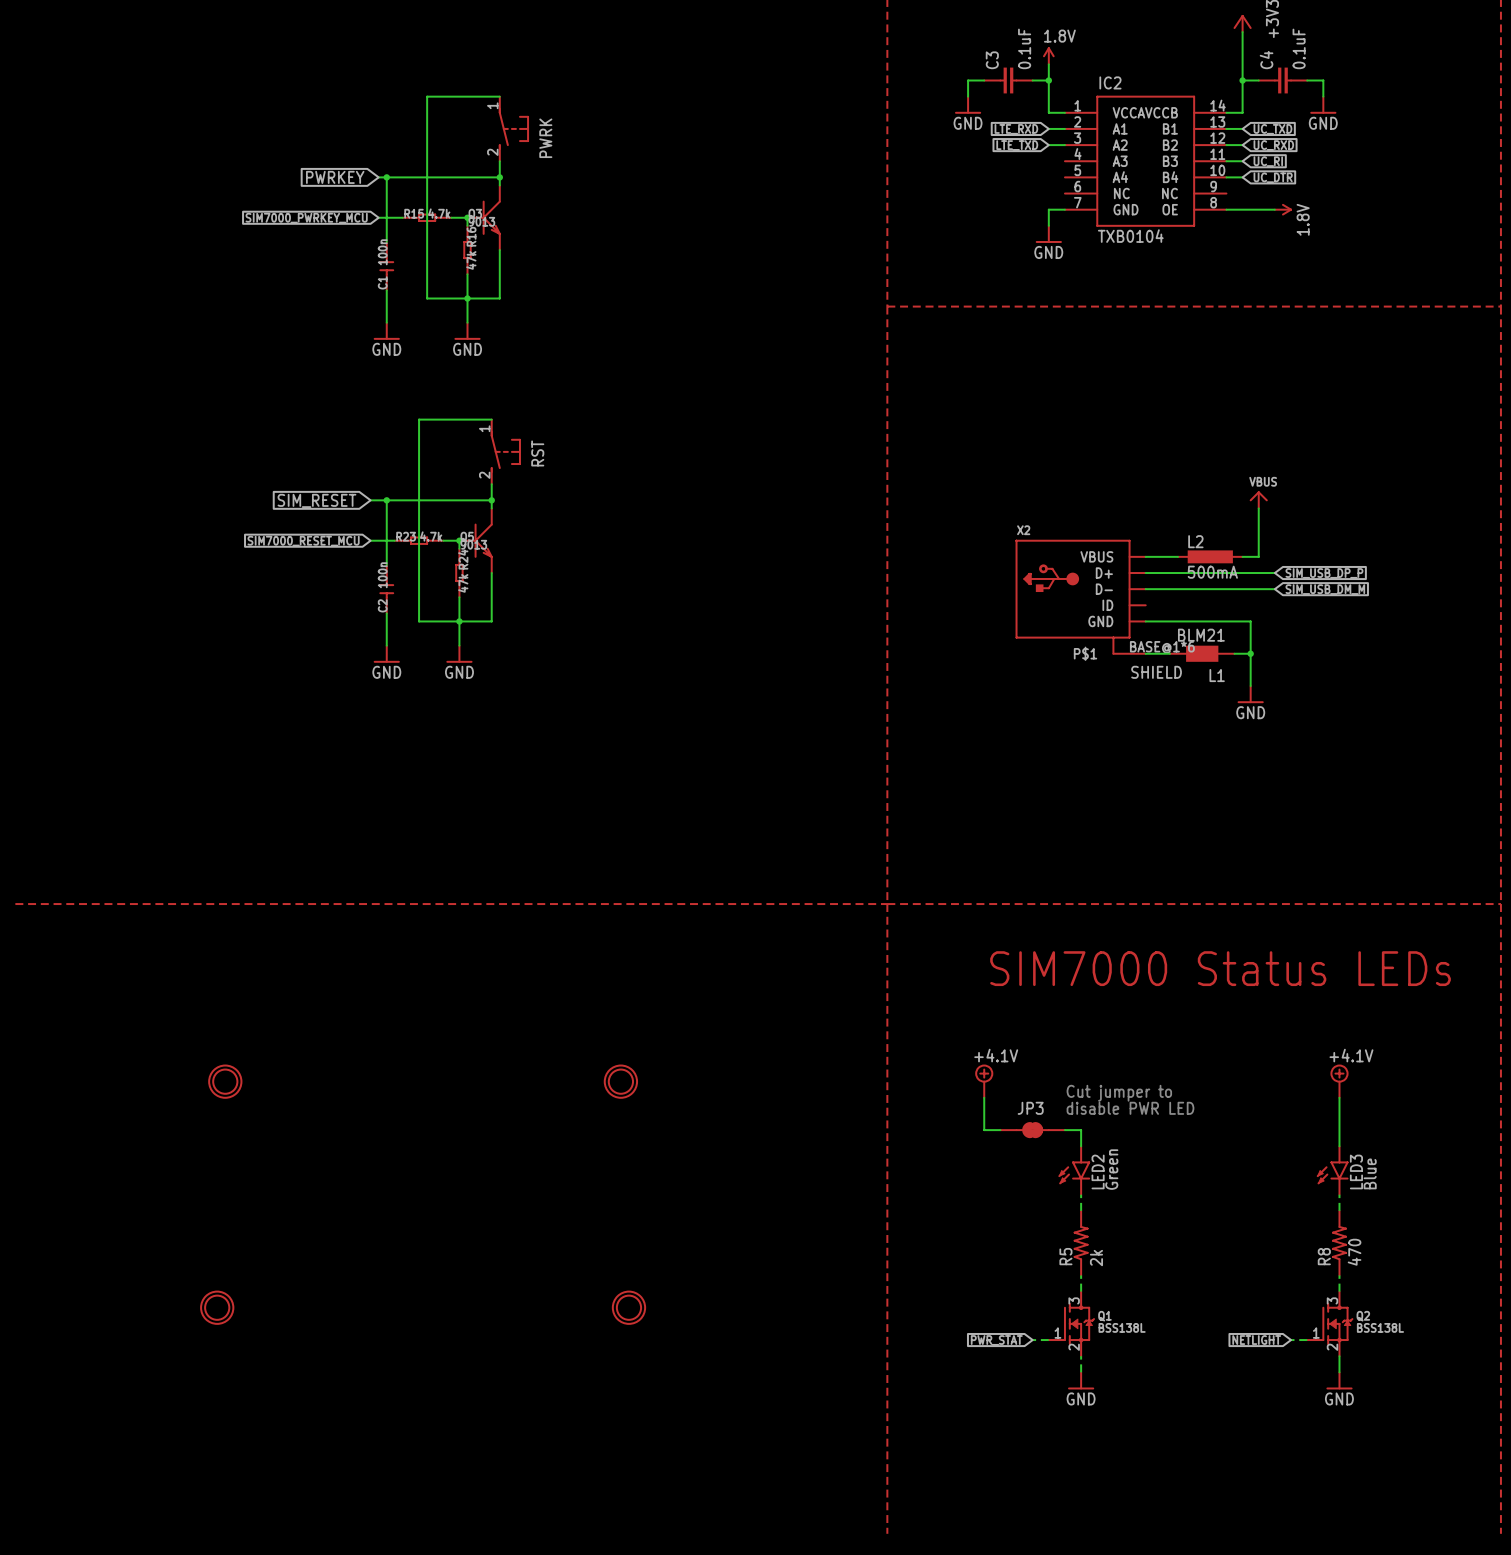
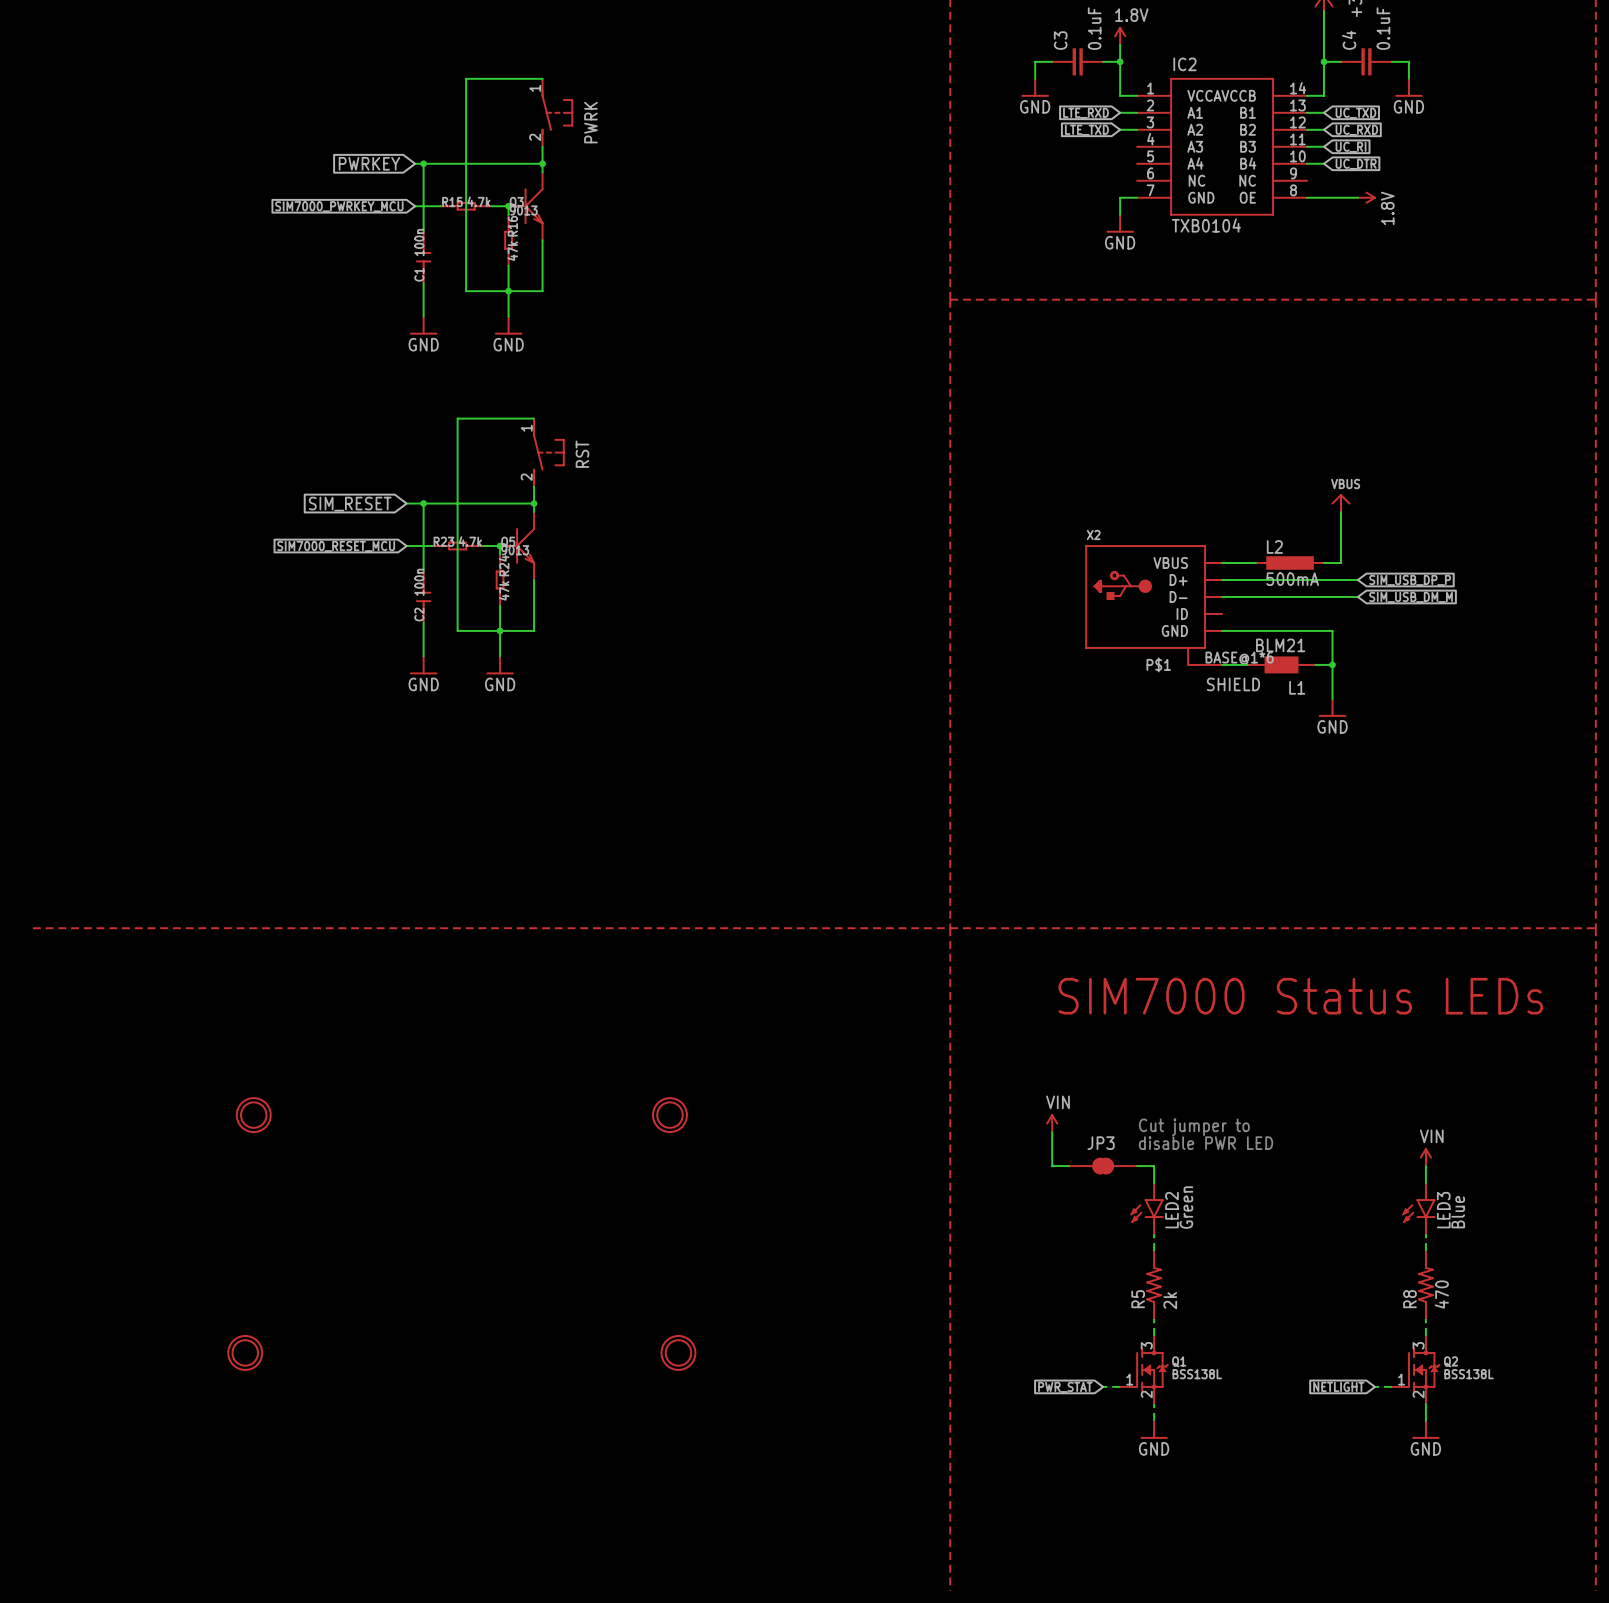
power symbol: +4.1V (984, 1081) -> none
power symbol: +4.1V (1339, 1081) -> none
power symbol: none -> VIN (1052, 1123)
power symbol: none -> VIN (1425, 1157)

